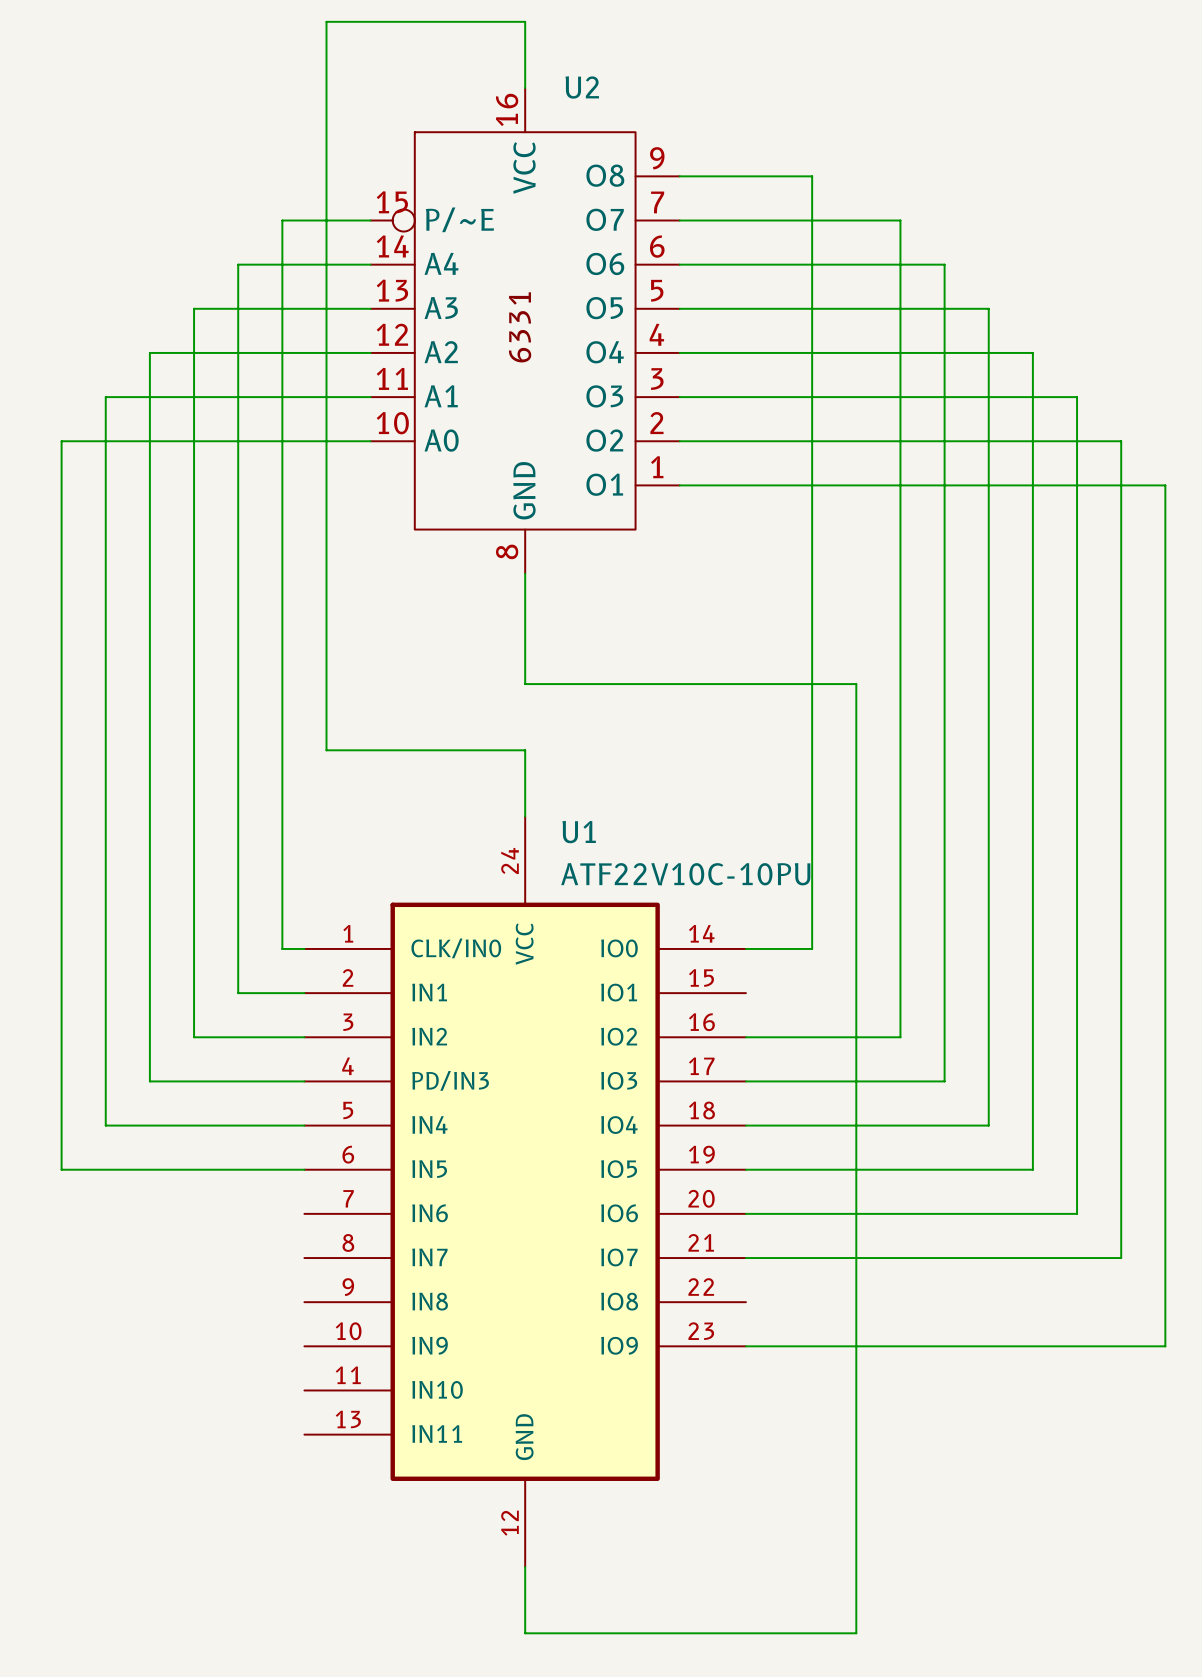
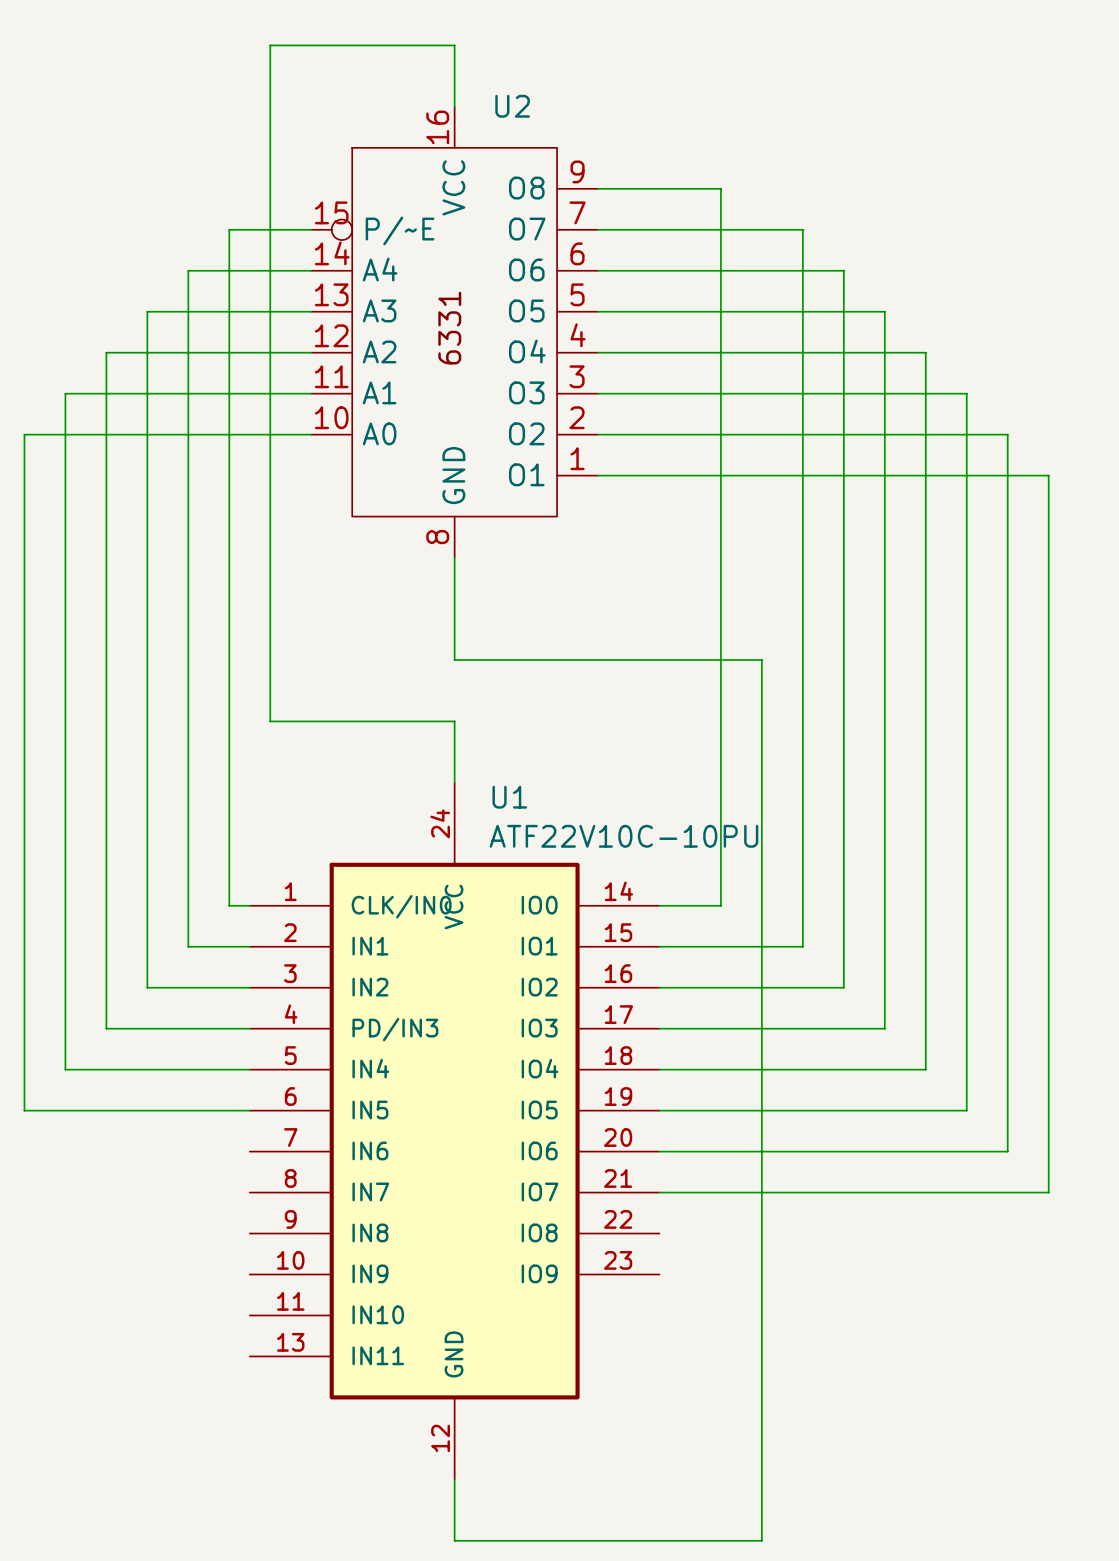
wire: none -> (659, 946) (802, 946)
wire: (900, 993) (900, 1037) -> (843, 987) (802, 987)
wire: (944, 1037) (944, 1081) -> none
wire: (988, 1081) (988, 1125) -> (884, 1028) (843, 1028)
wire: (1032, 1125) (1032, 1169) -> (925, 1069) (884, 1069)
wire: (1077, 1169) (1077, 1213) -> (966, 1110) (925, 1110)
wire: (1121, 1213) (1121, 1258) -> (1007, 1151) (966, 1151)
wire: (1165, 1258) (1165, 1346) (745, 1346) -> (1048, 1192) (1007, 1192)

